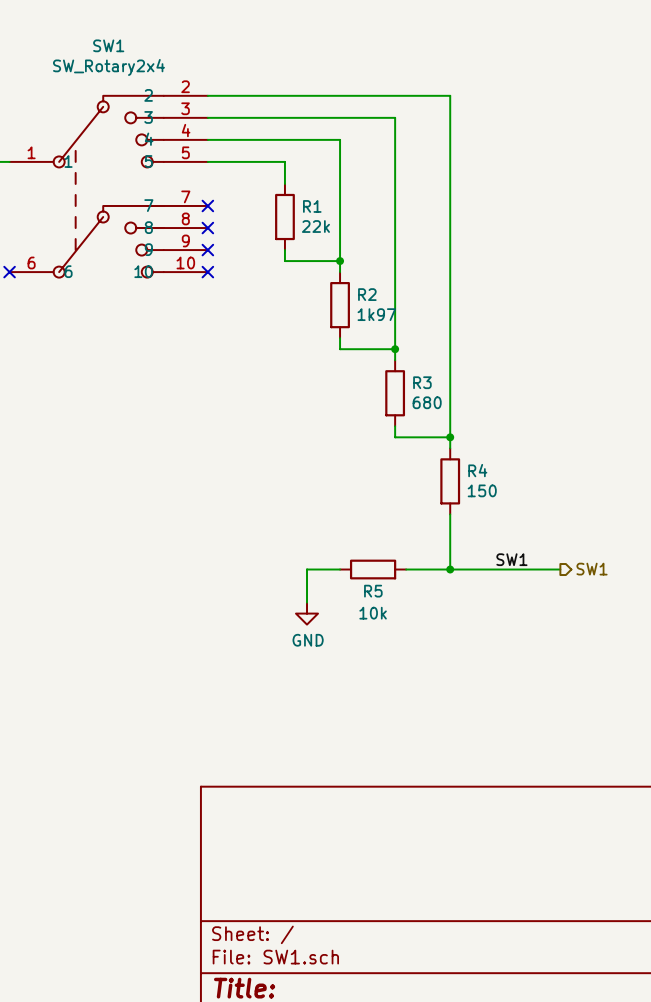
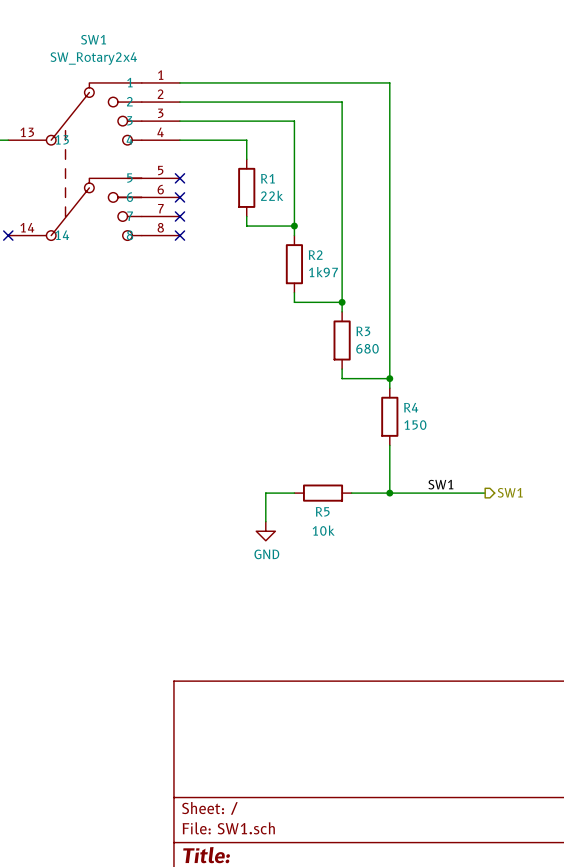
SW1 symbol: [9, 95, 208, 278] -> [8, 82, 180, 241]

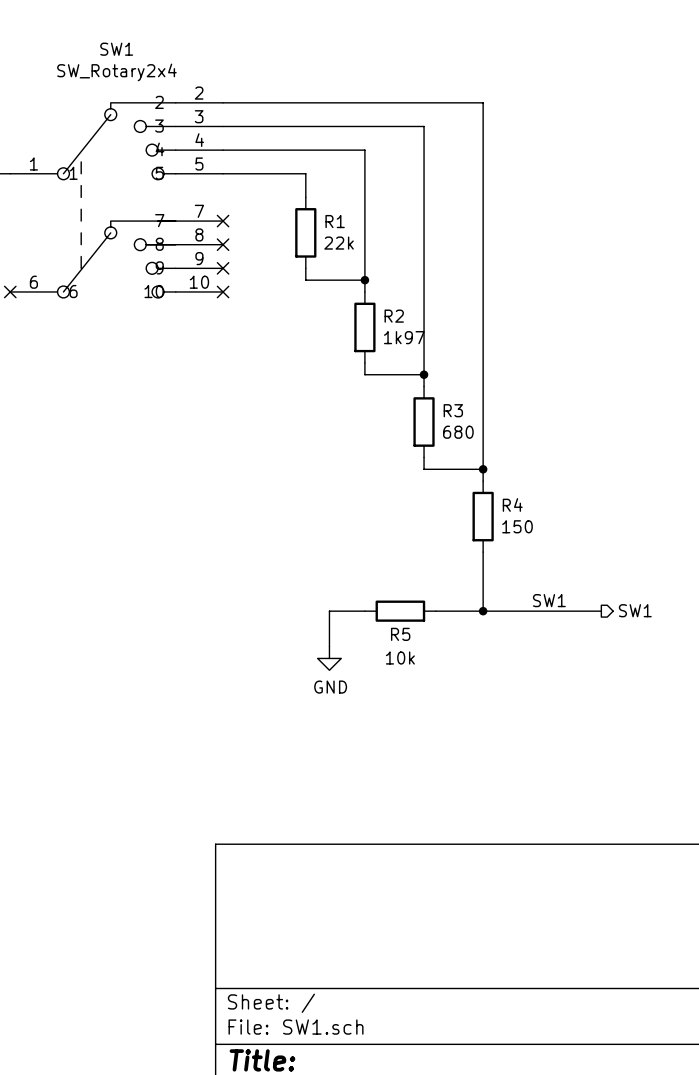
SW1 symbol: [8, 82, 180, 241] -> [10, 102, 224, 298]

